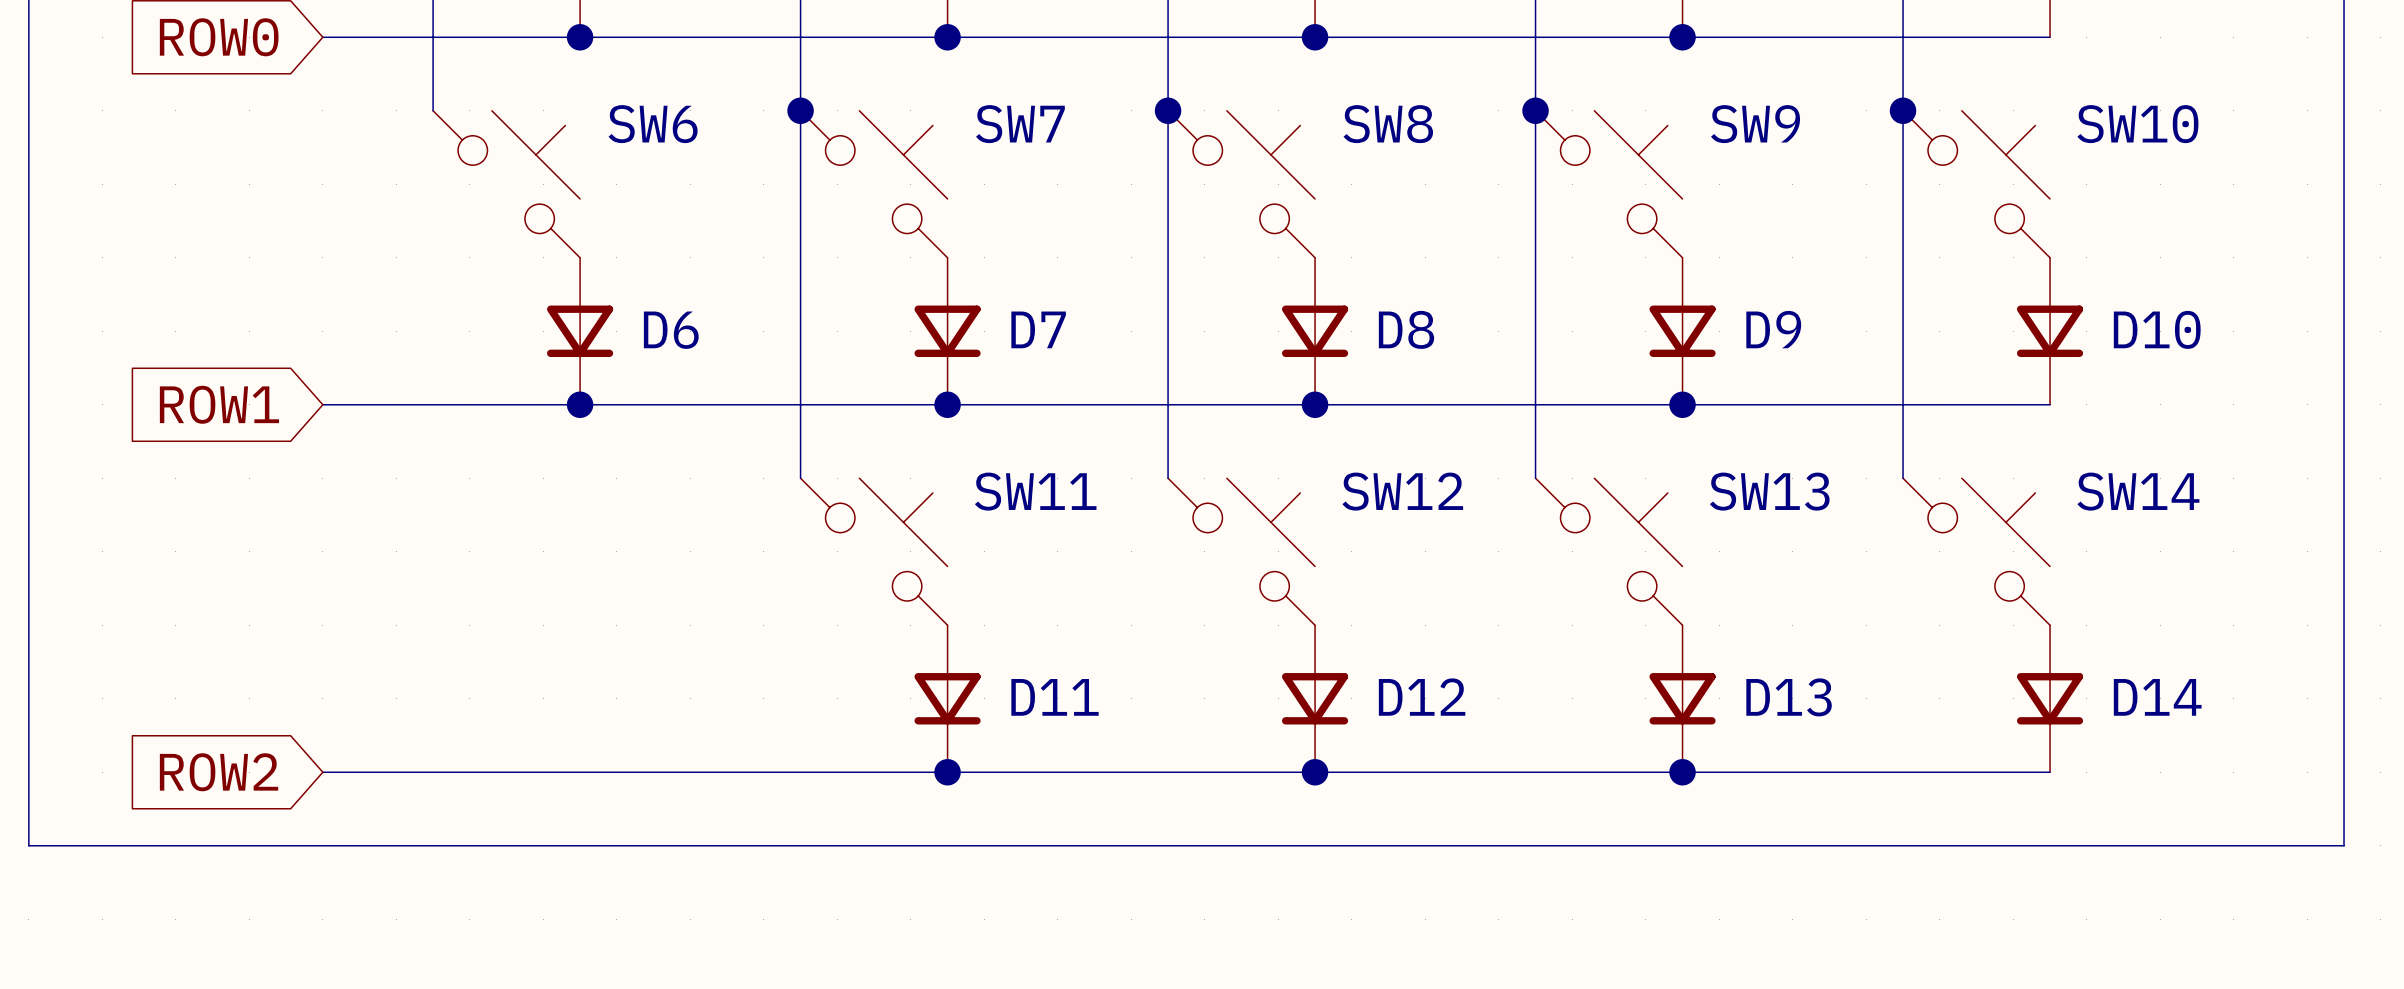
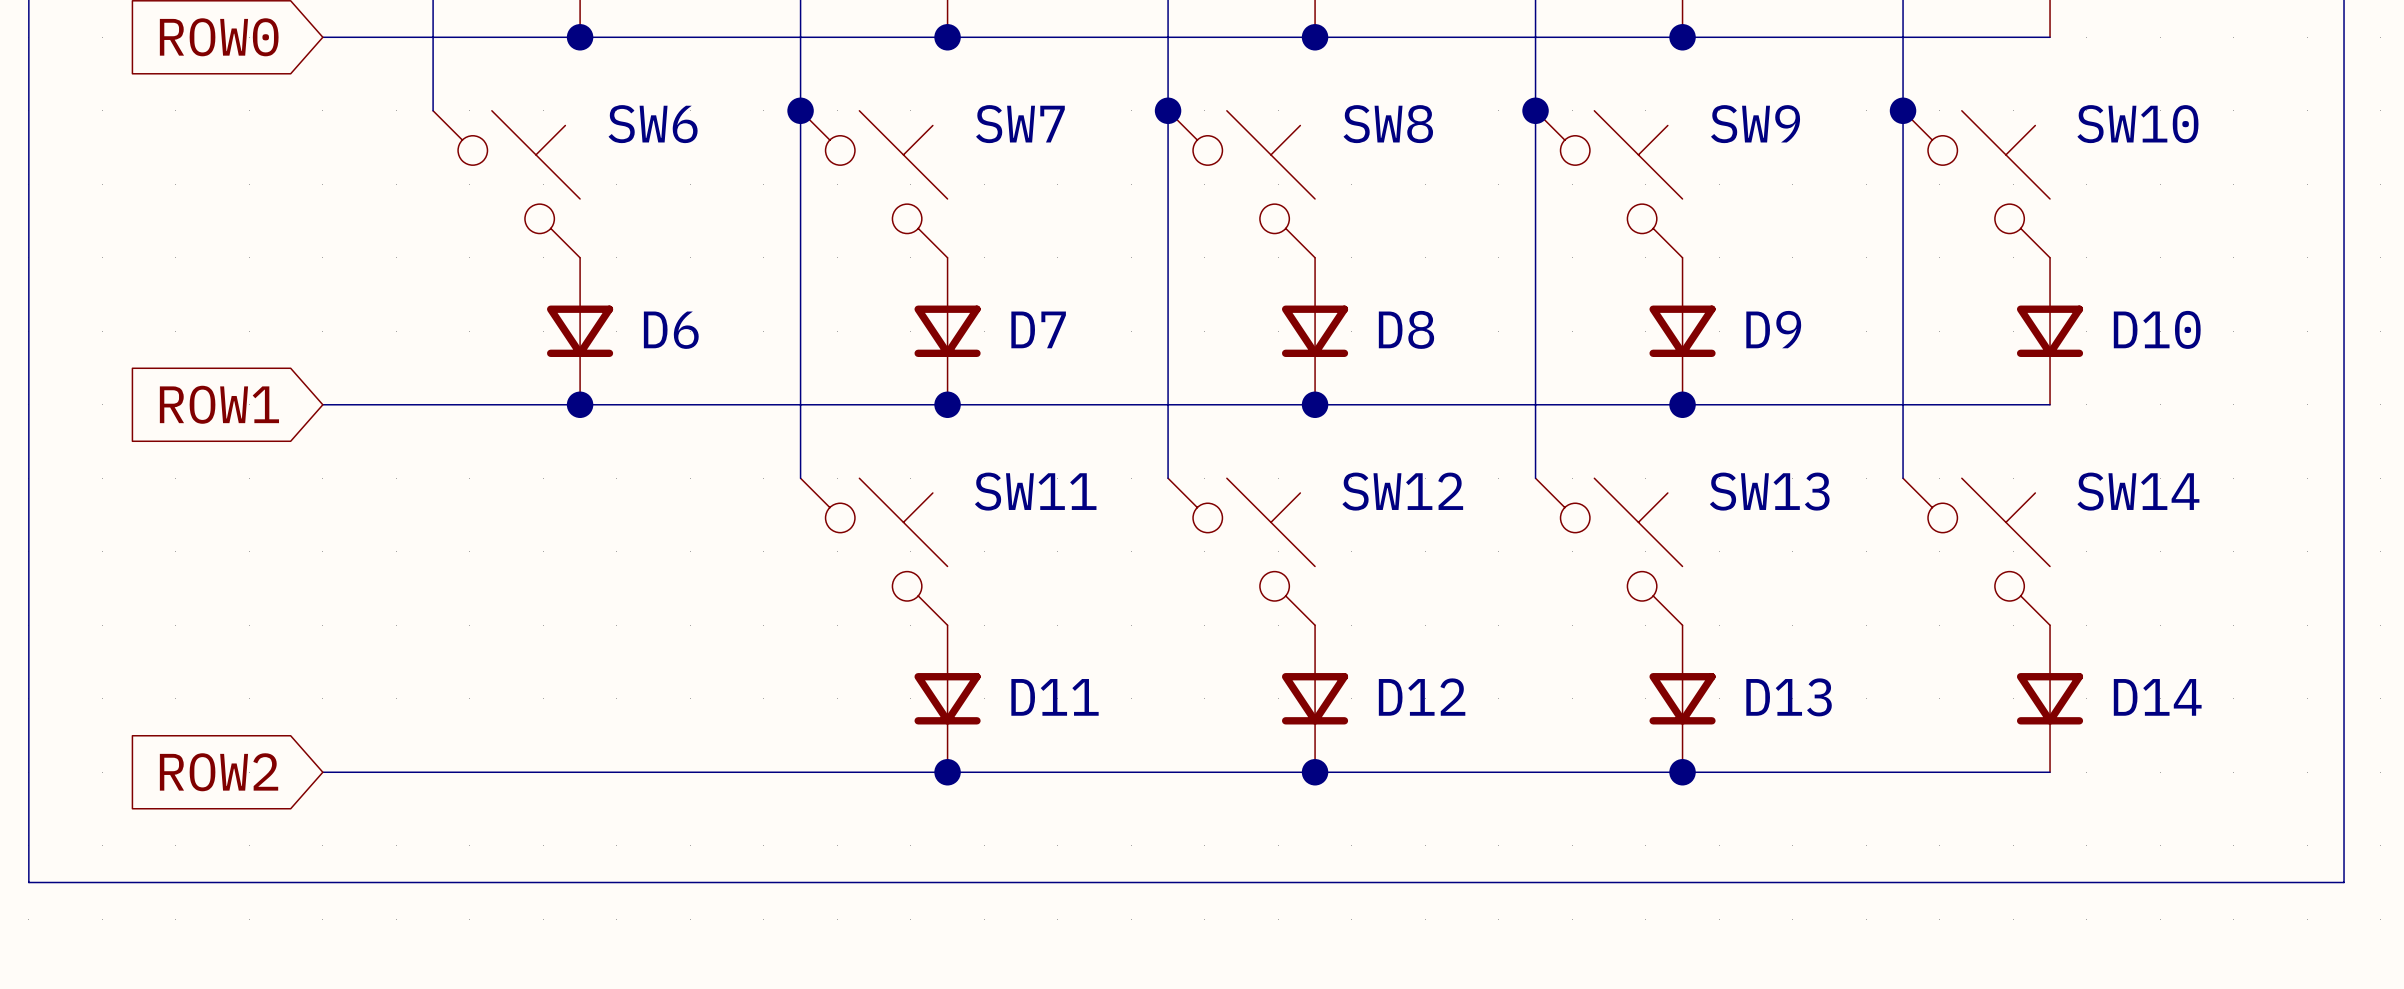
line: (28, 845) (2344, 845) -> (28, 845) (28, 882) (2344, 882) (2344, 845)

